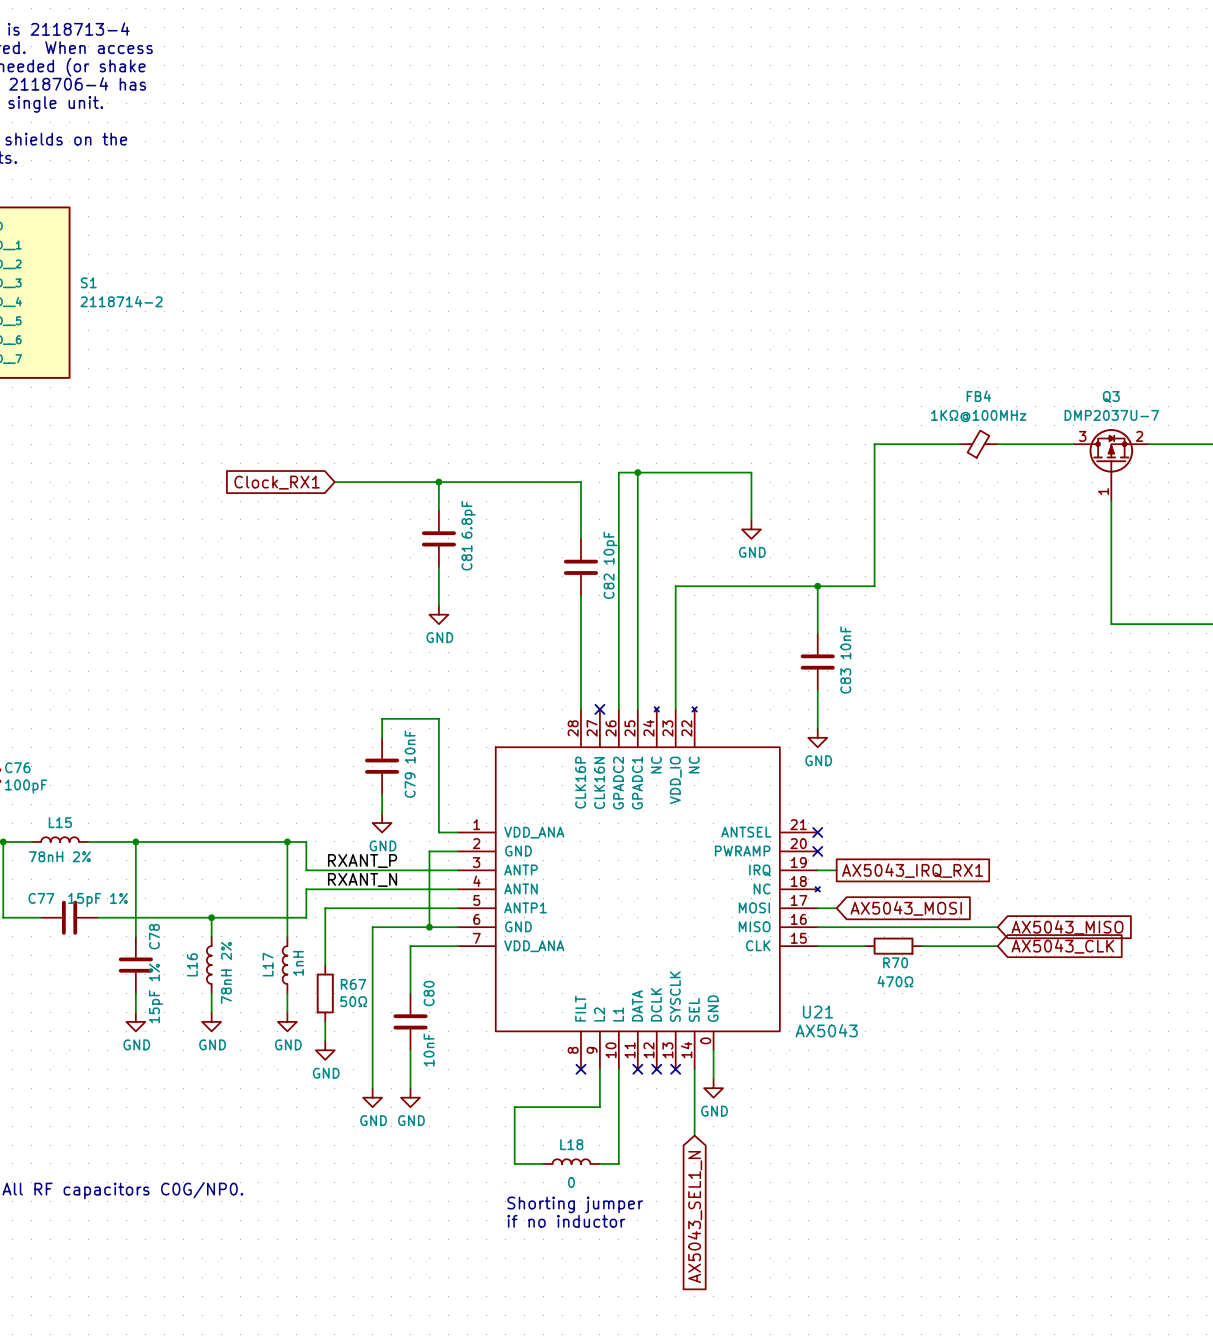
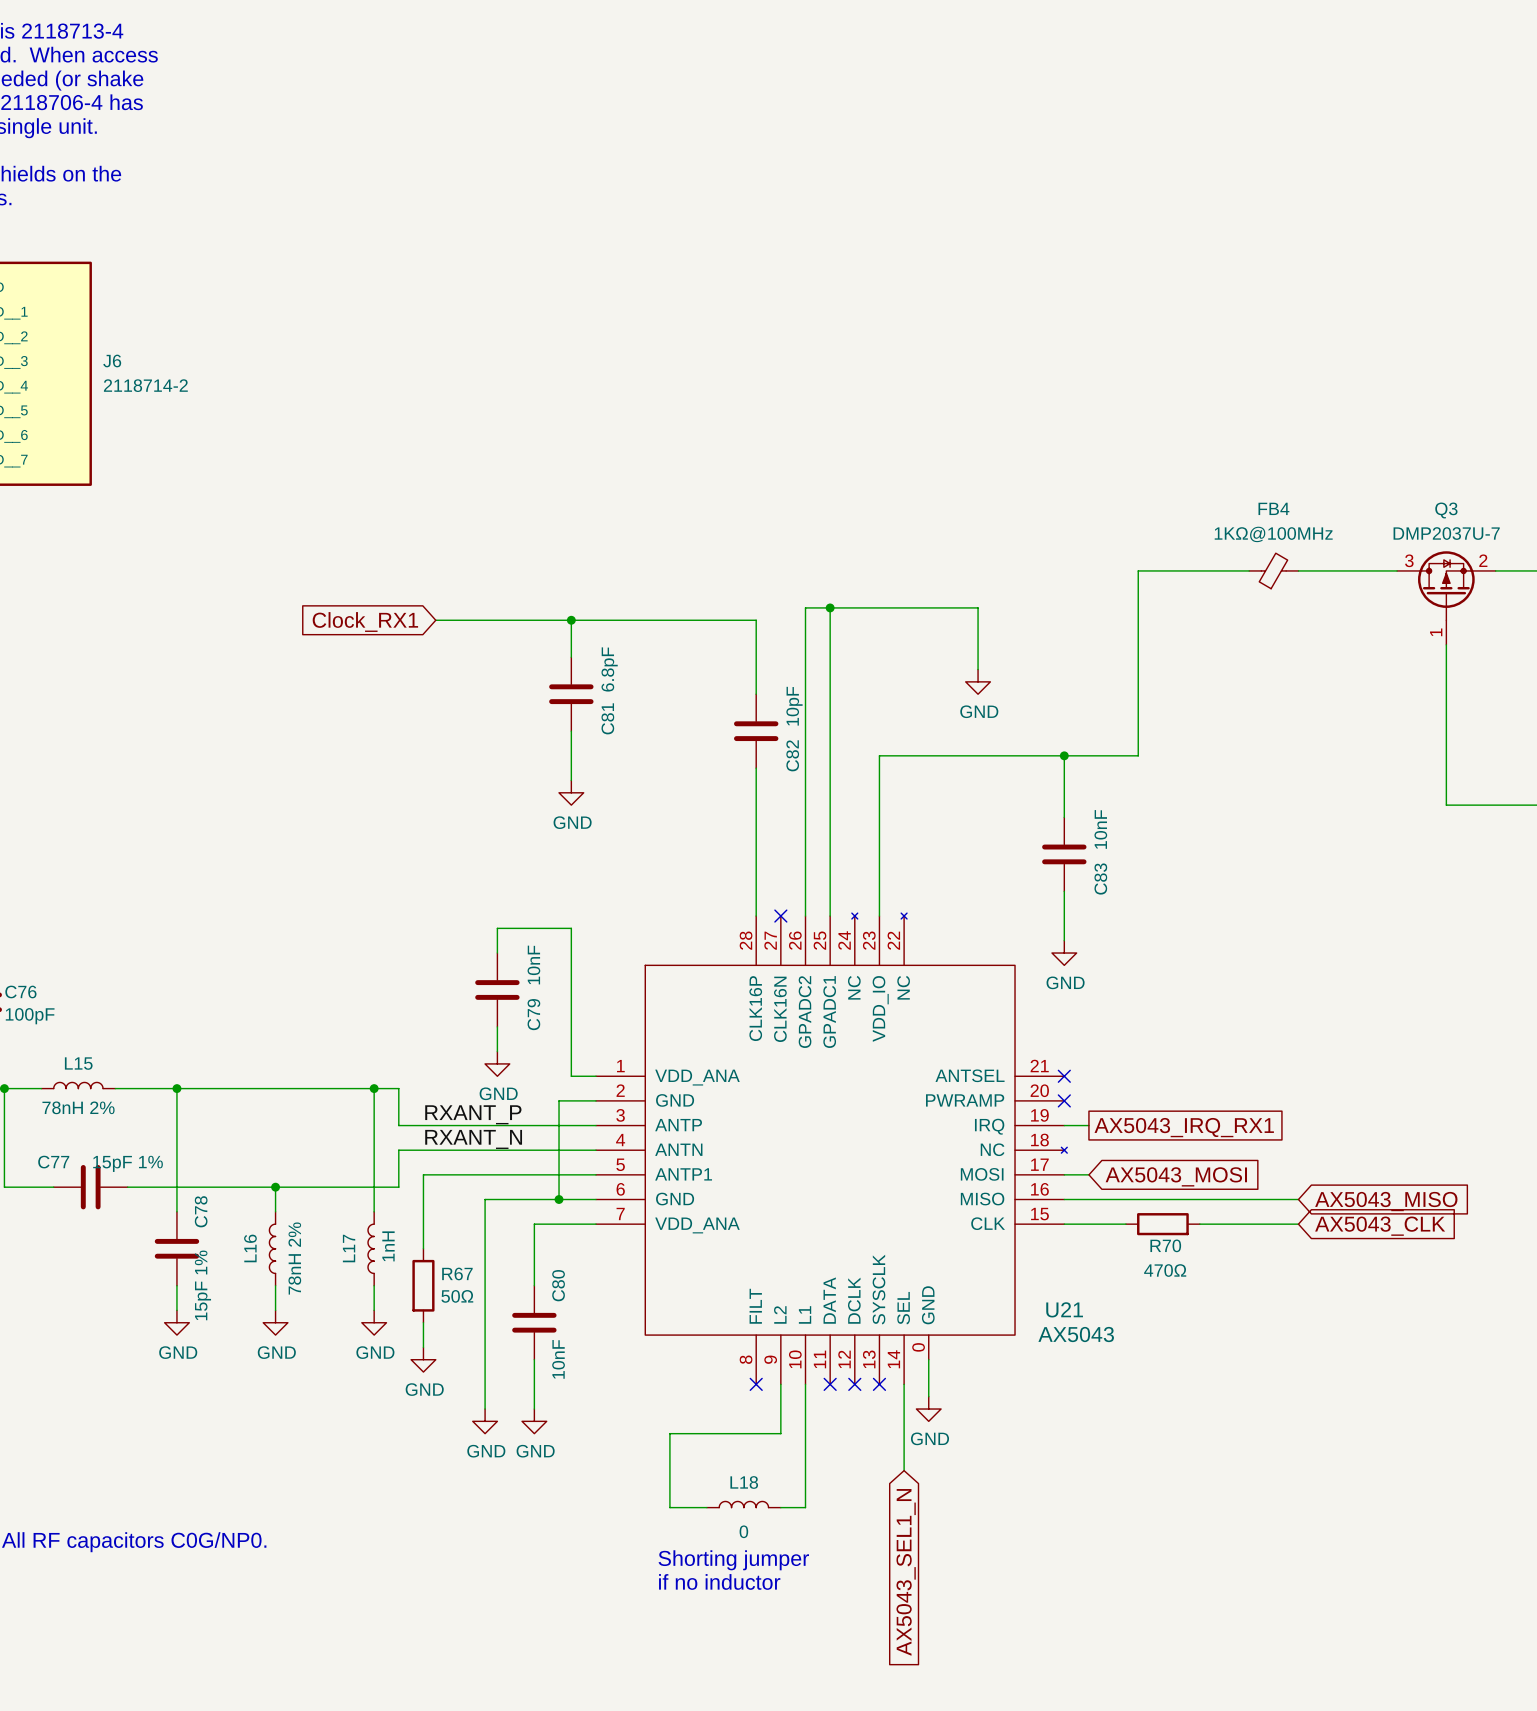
S1 name: S1 (88, 282) -> J6 (112, 360)

